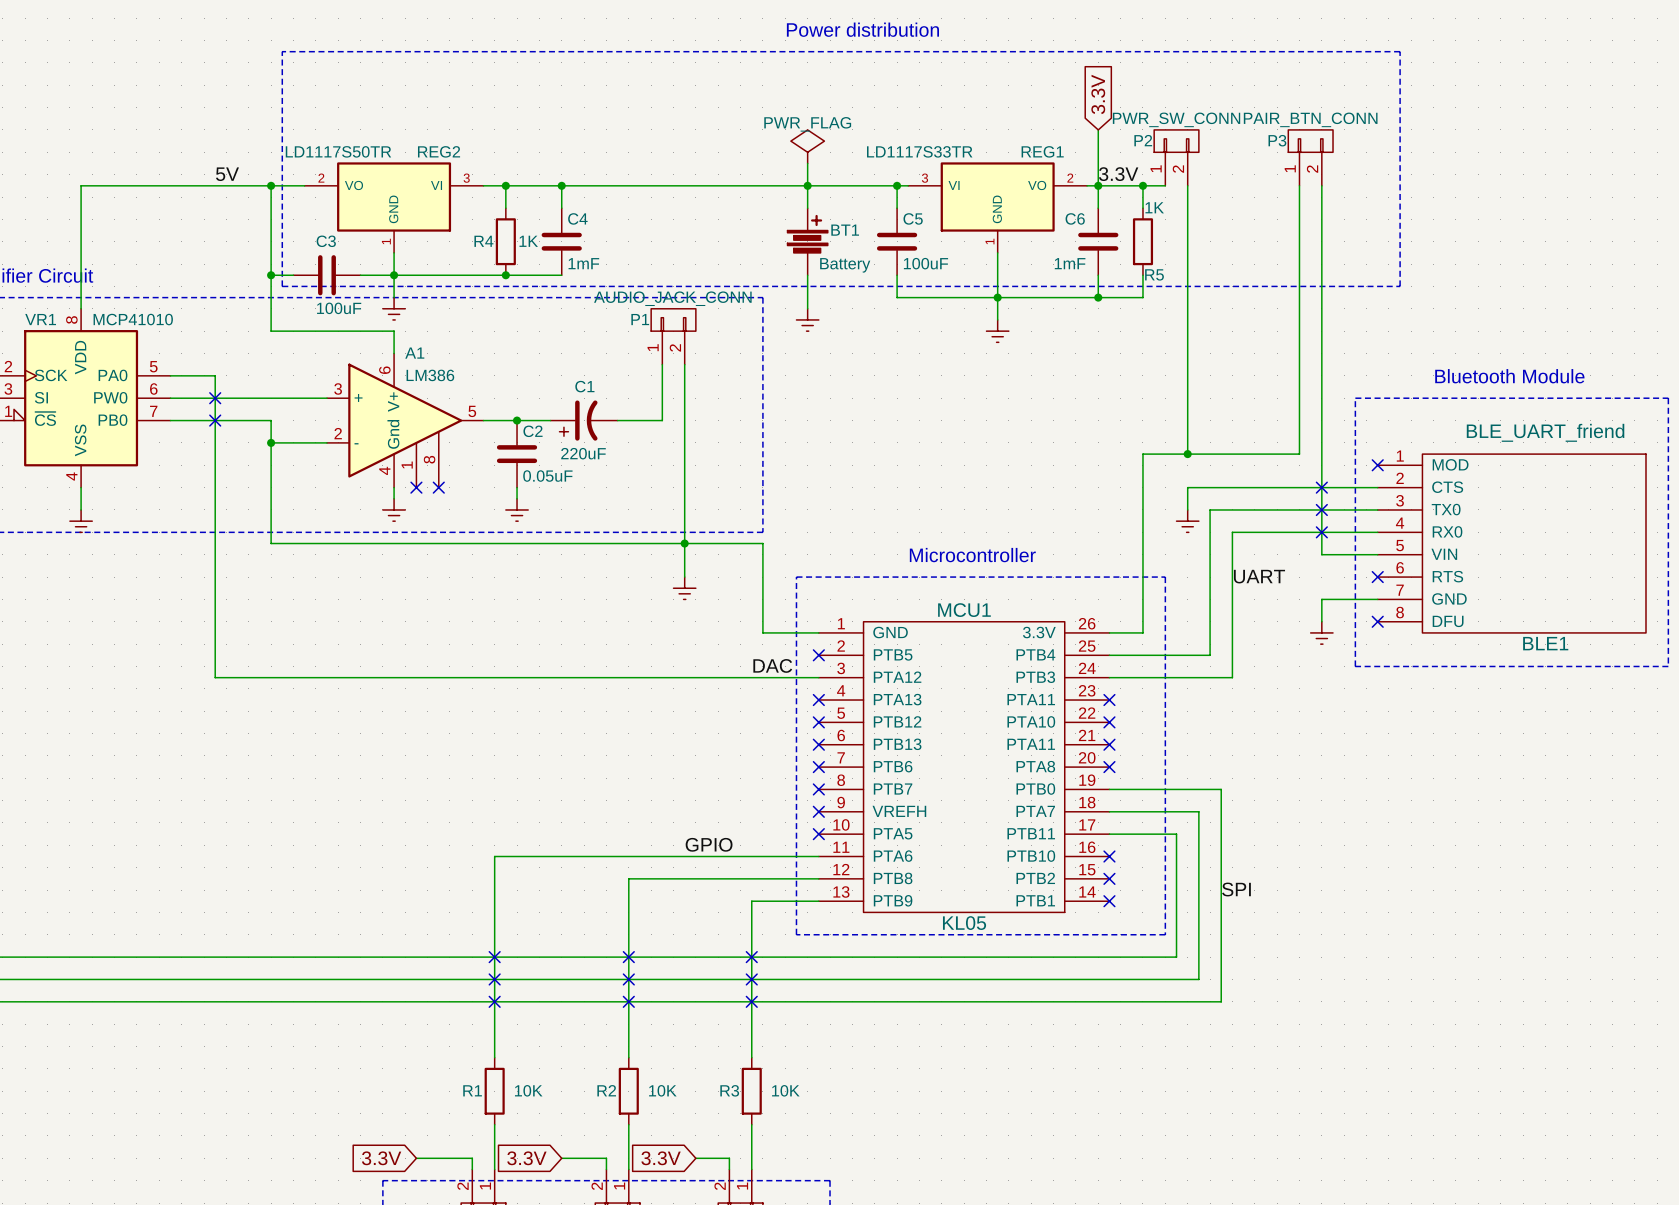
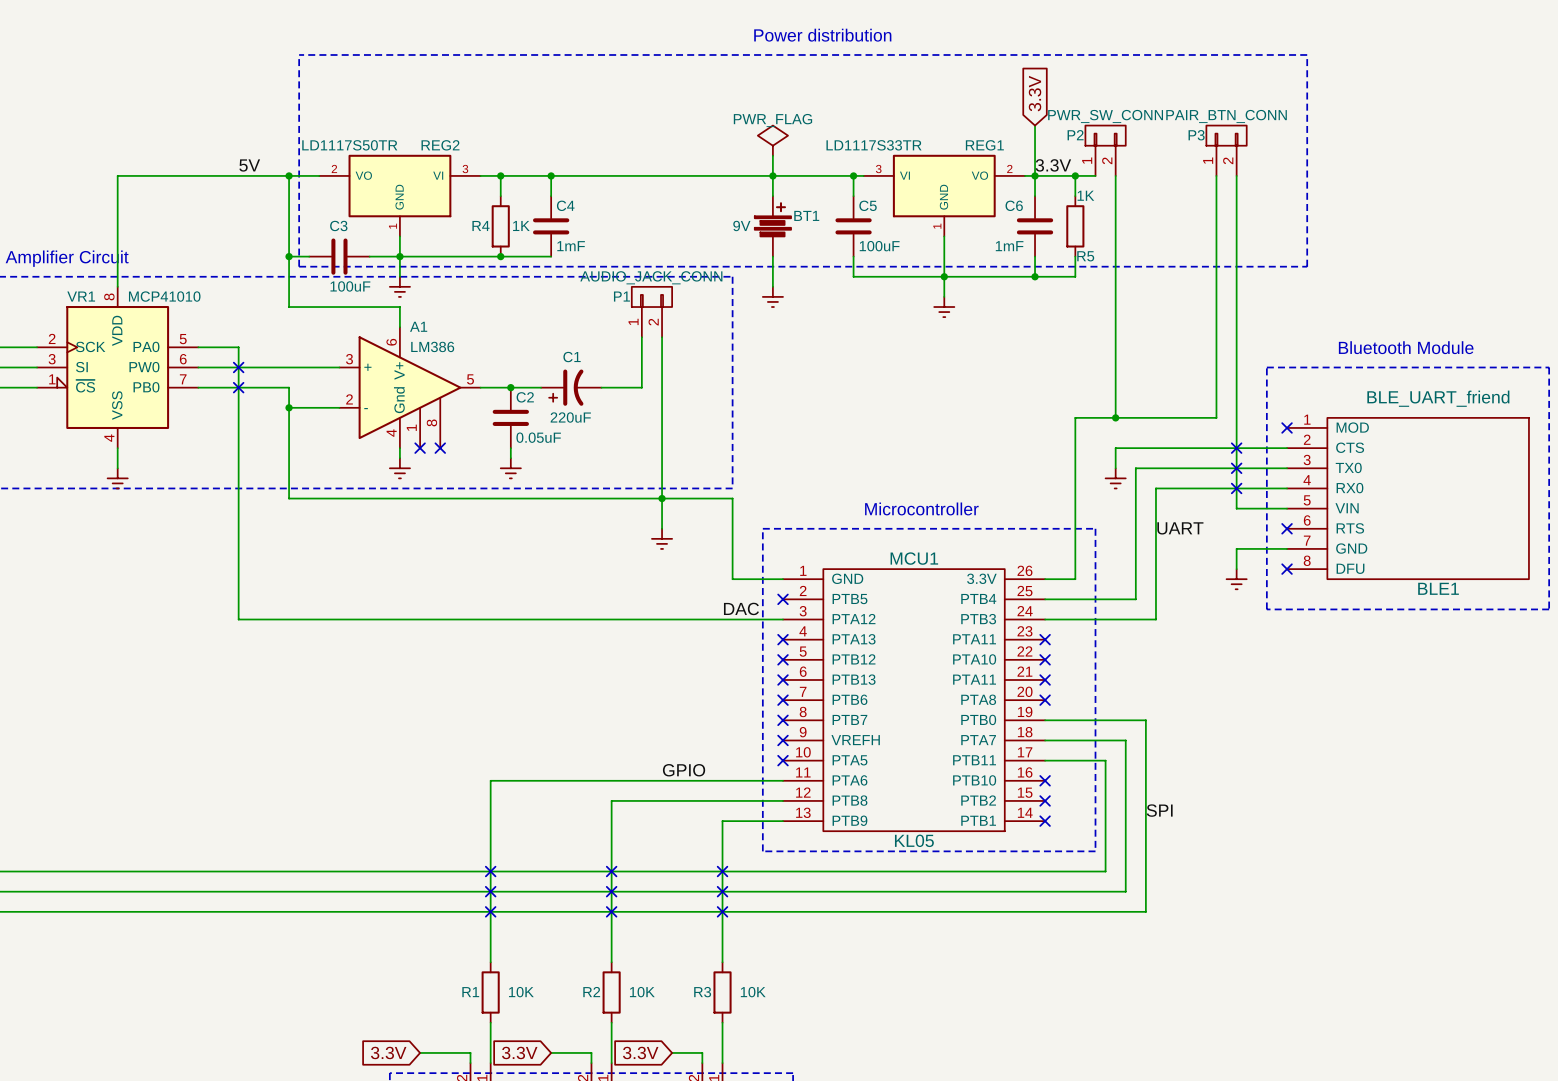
BT1 value: Battery (845, 265) -> 9V (741, 225)

